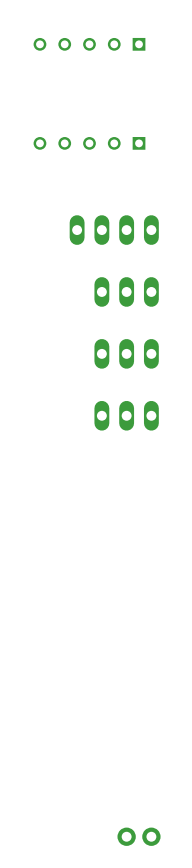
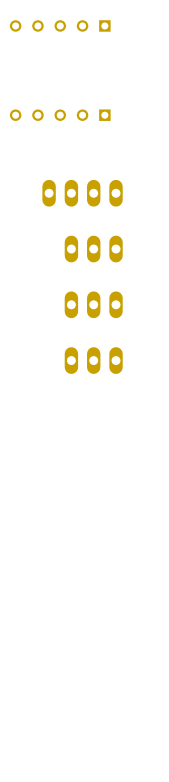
part: (139, 836) -> none

